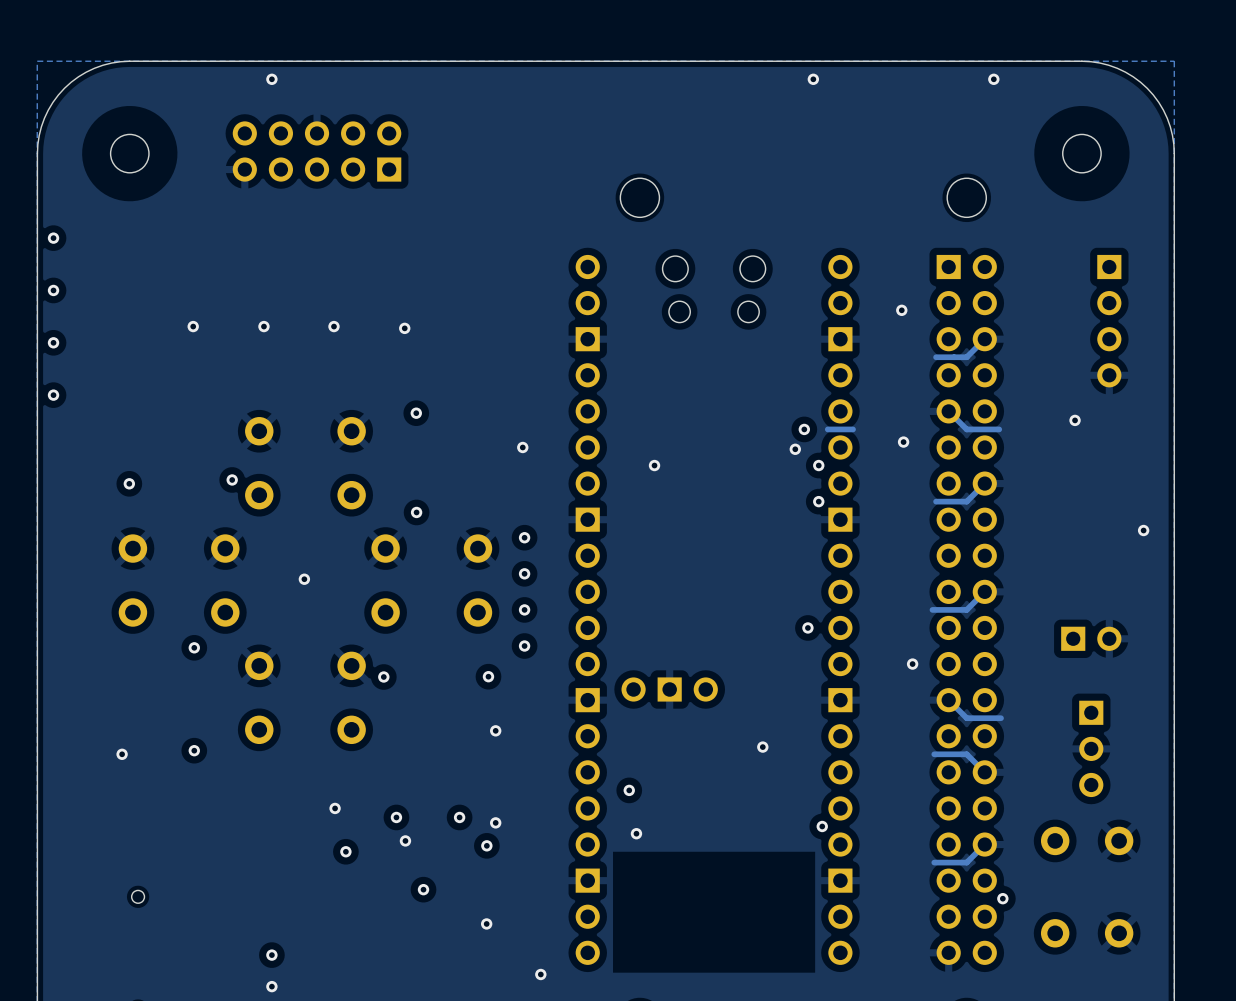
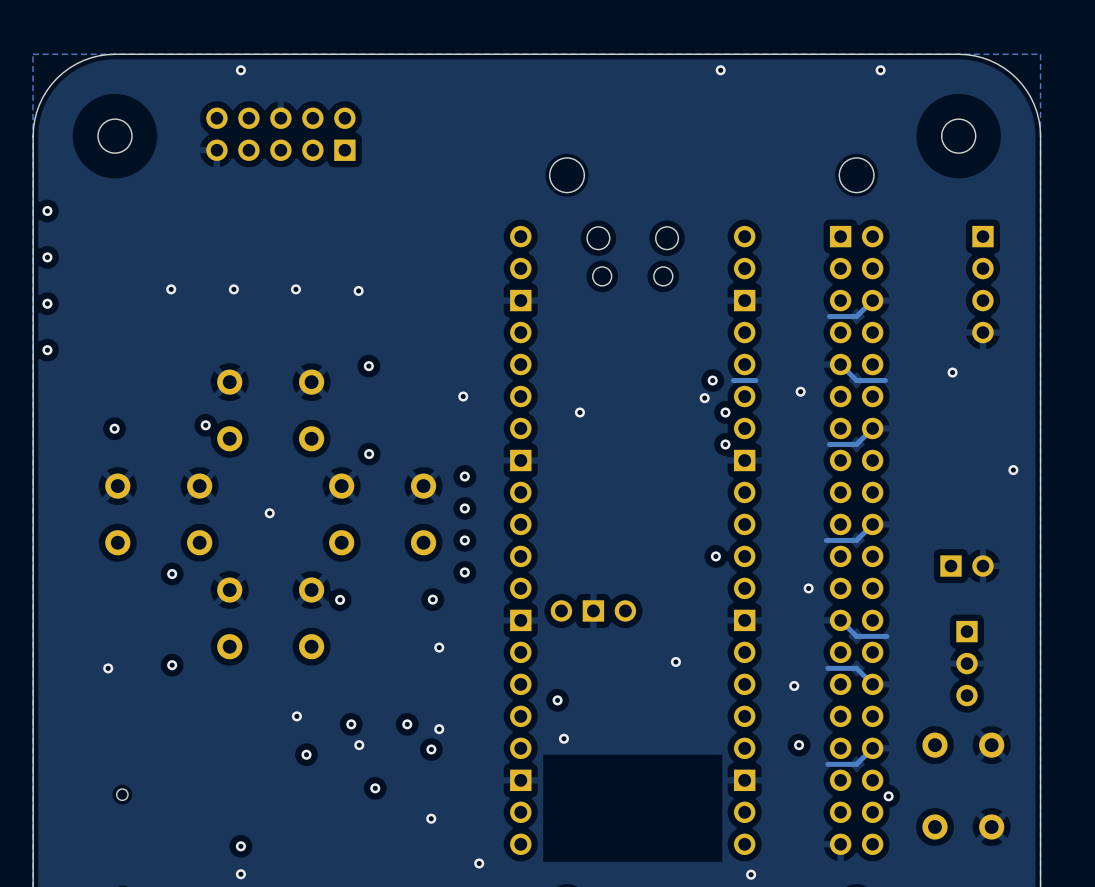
via: (901, 310) -> none
via: none -> (794, 685)
via: (822, 826) -> none
via: none -> (799, 745)
via: none -> (751, 874)

